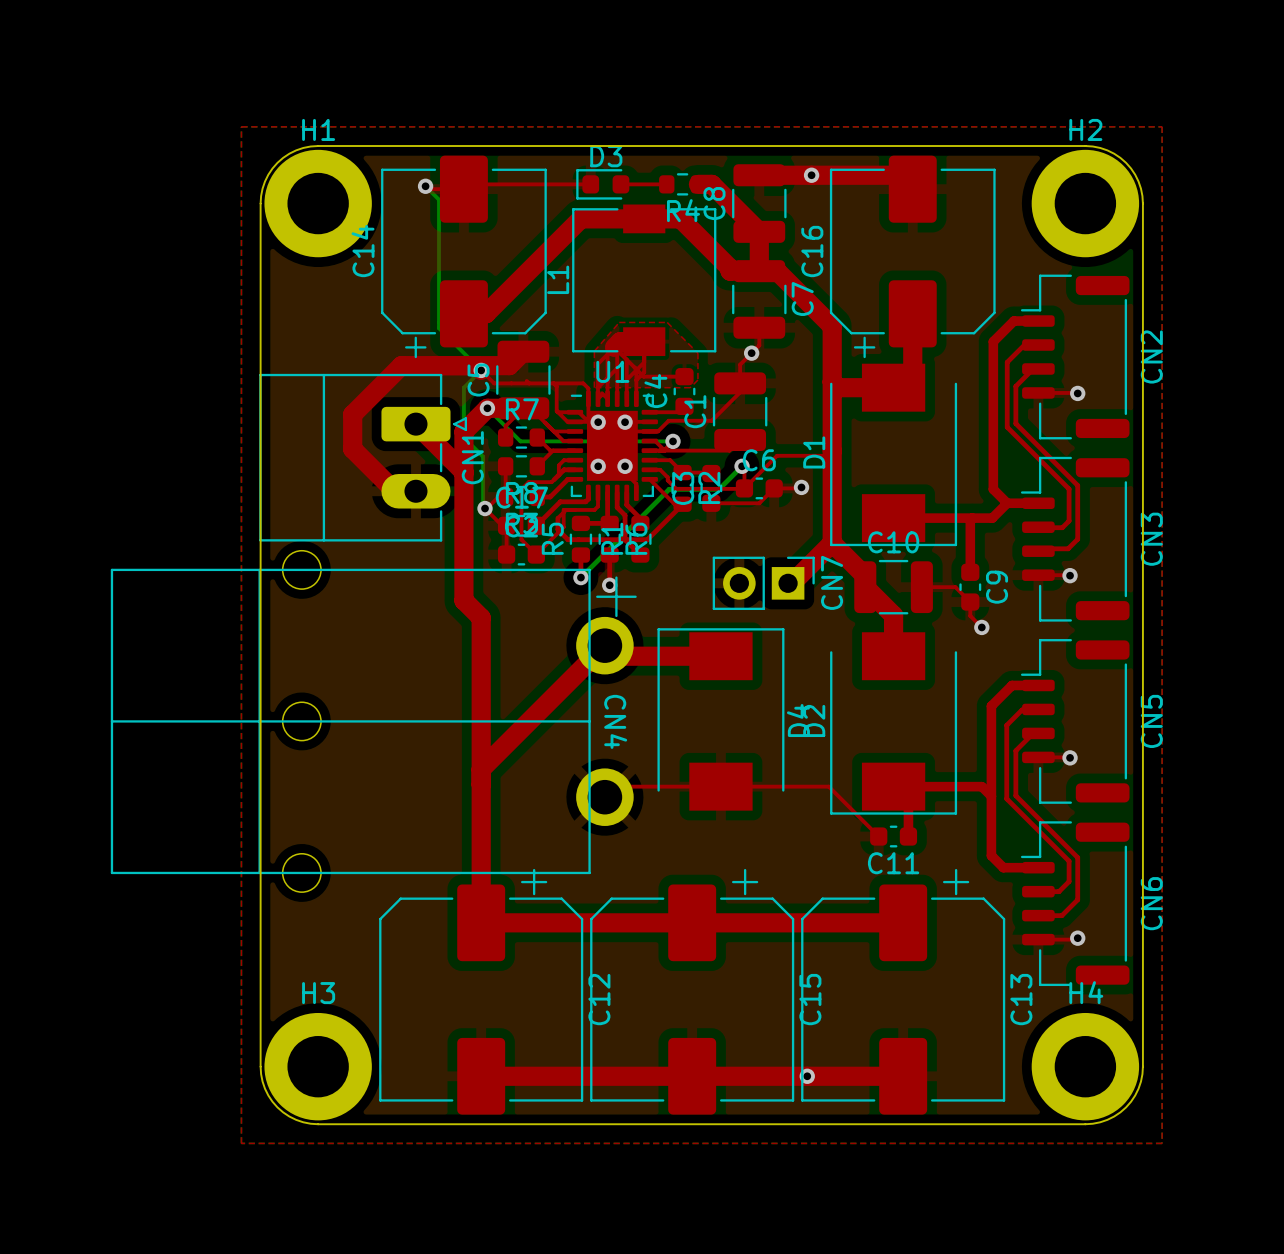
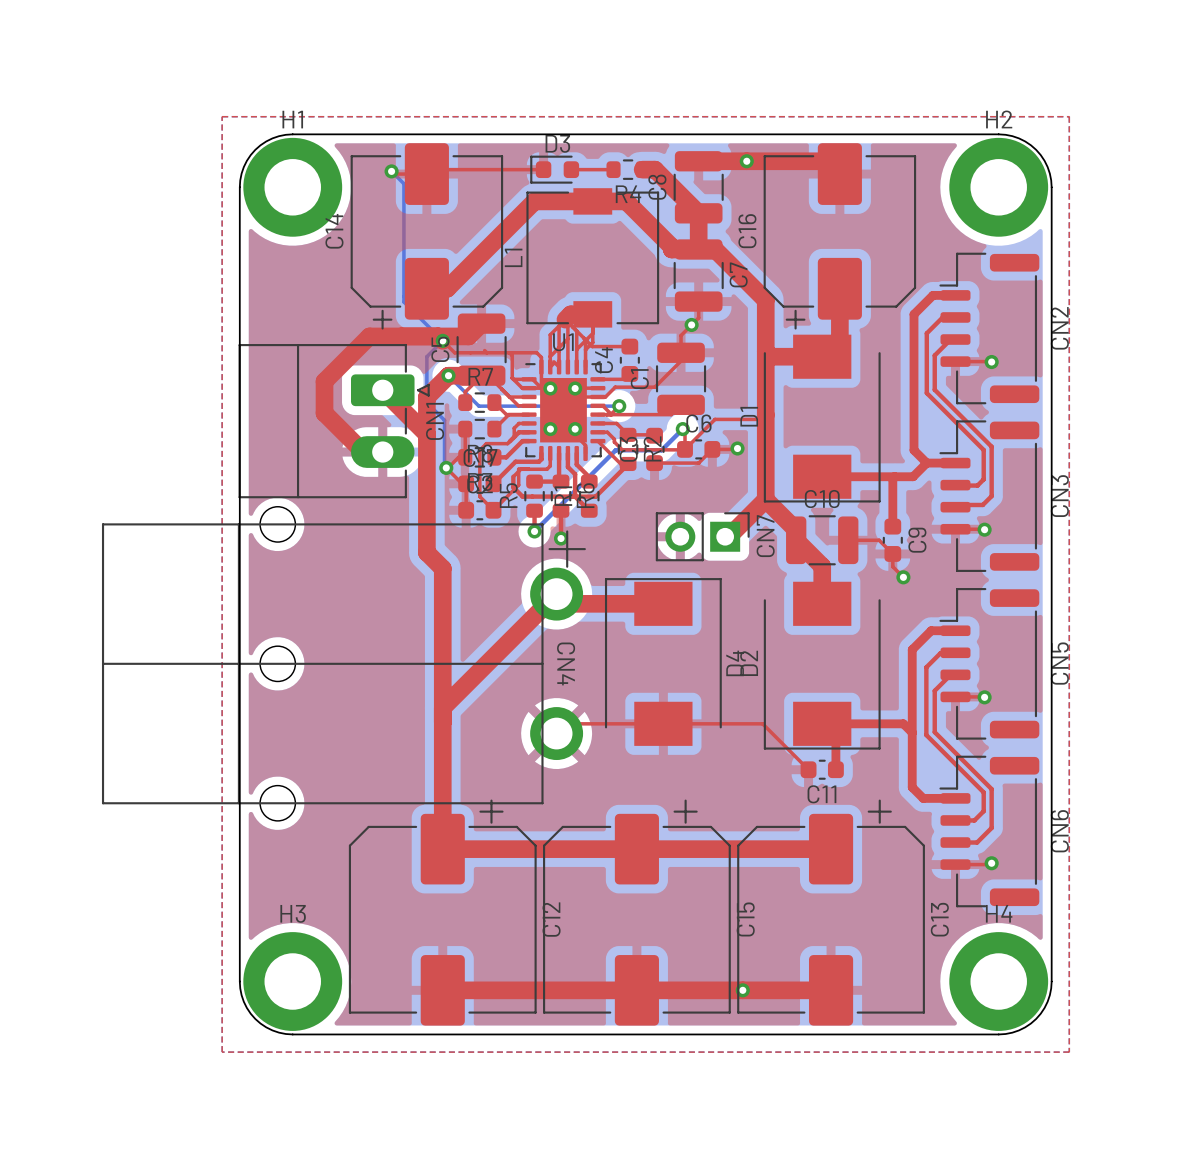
top zone outline: (619, 322) (594, 351) (594, 387) (690, 387) (697, 380) (697, 353) (667, 322) (619, 322) -> none

